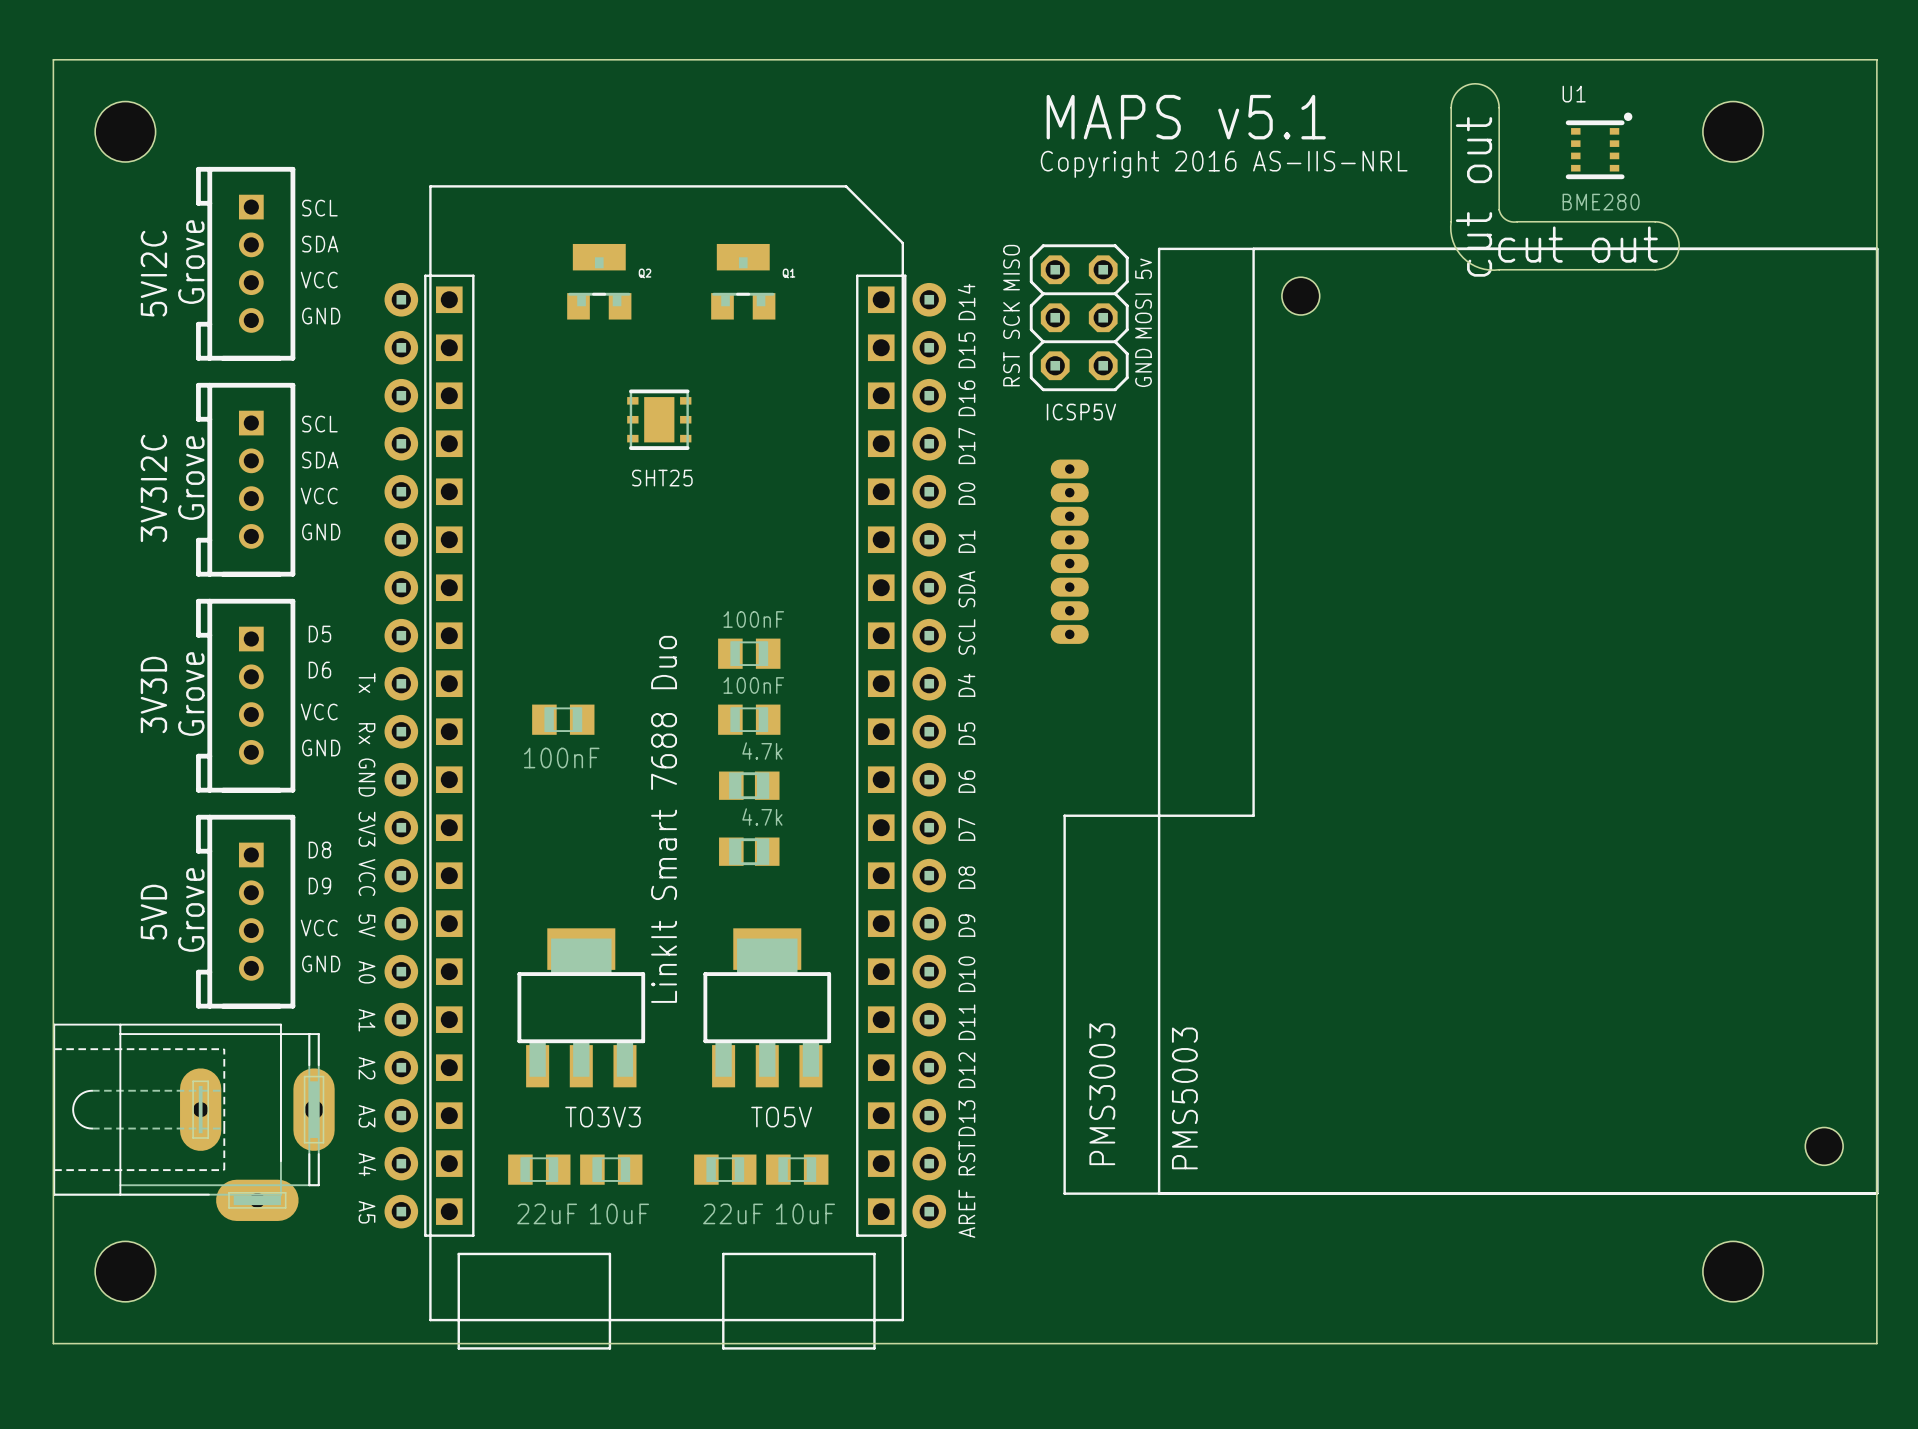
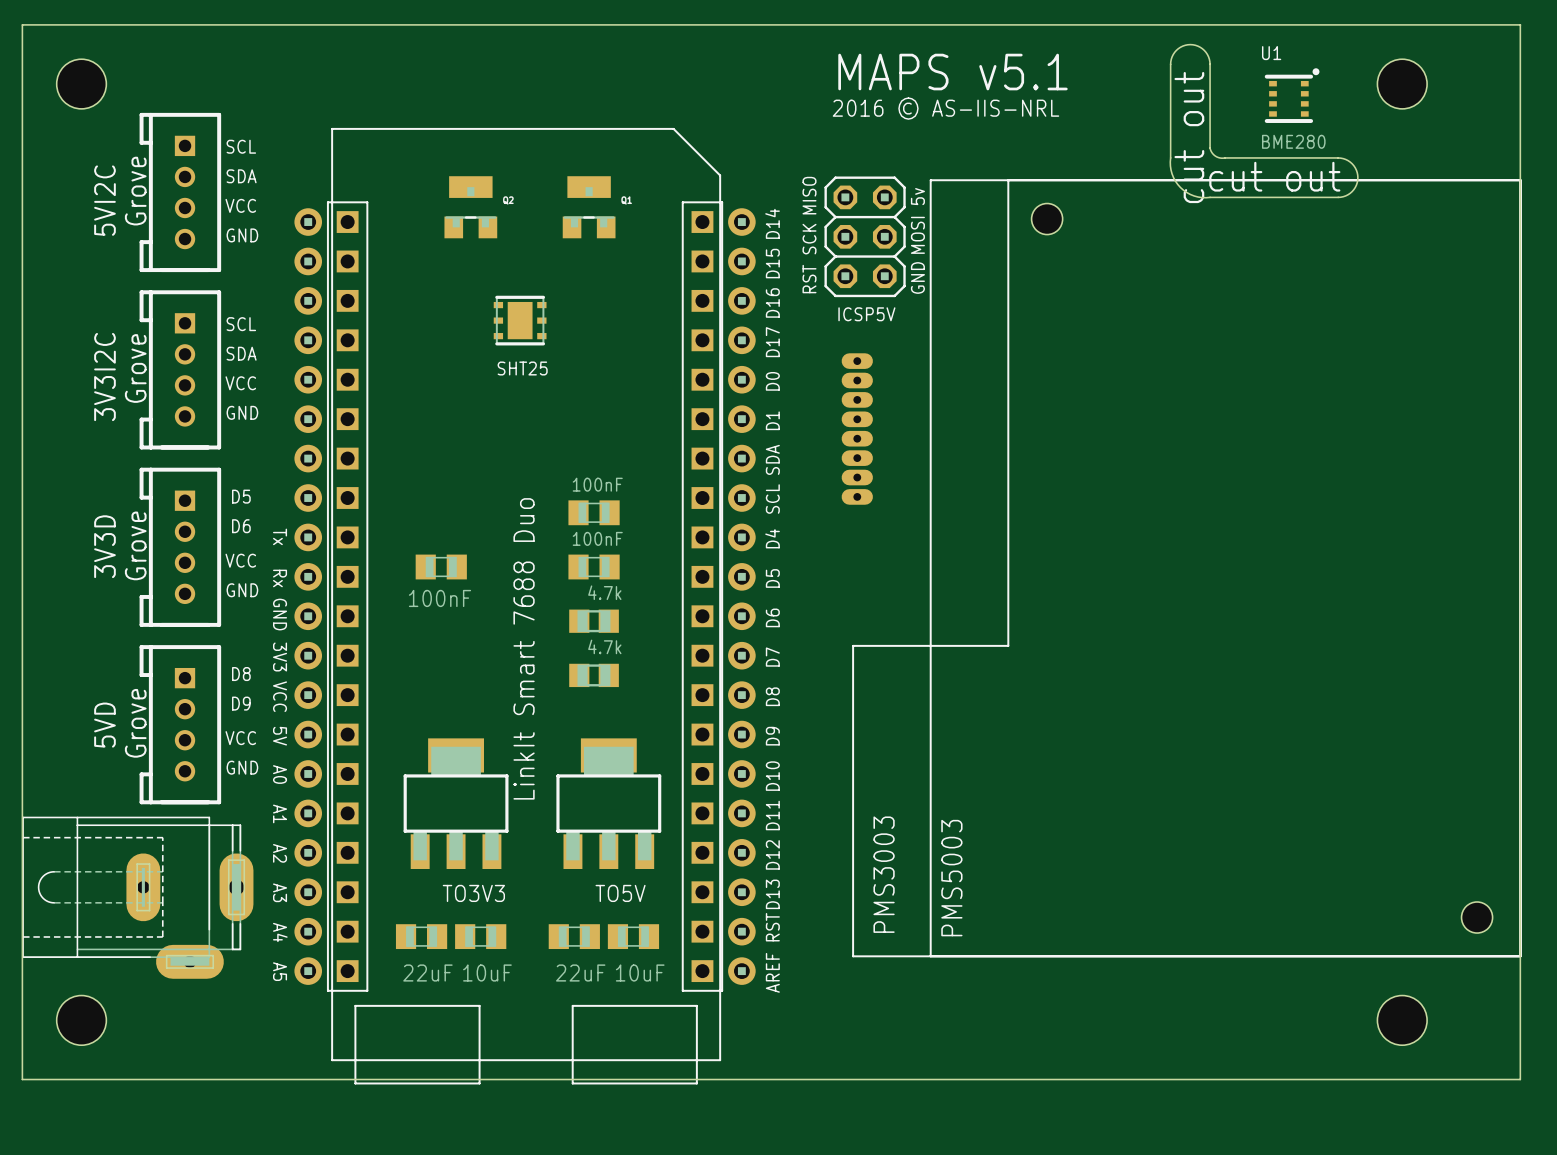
text: Copyright 2016 AS-IIS-NRL (1224, 164) -> 2016 © AS-IIS-NRL (945, 108)

